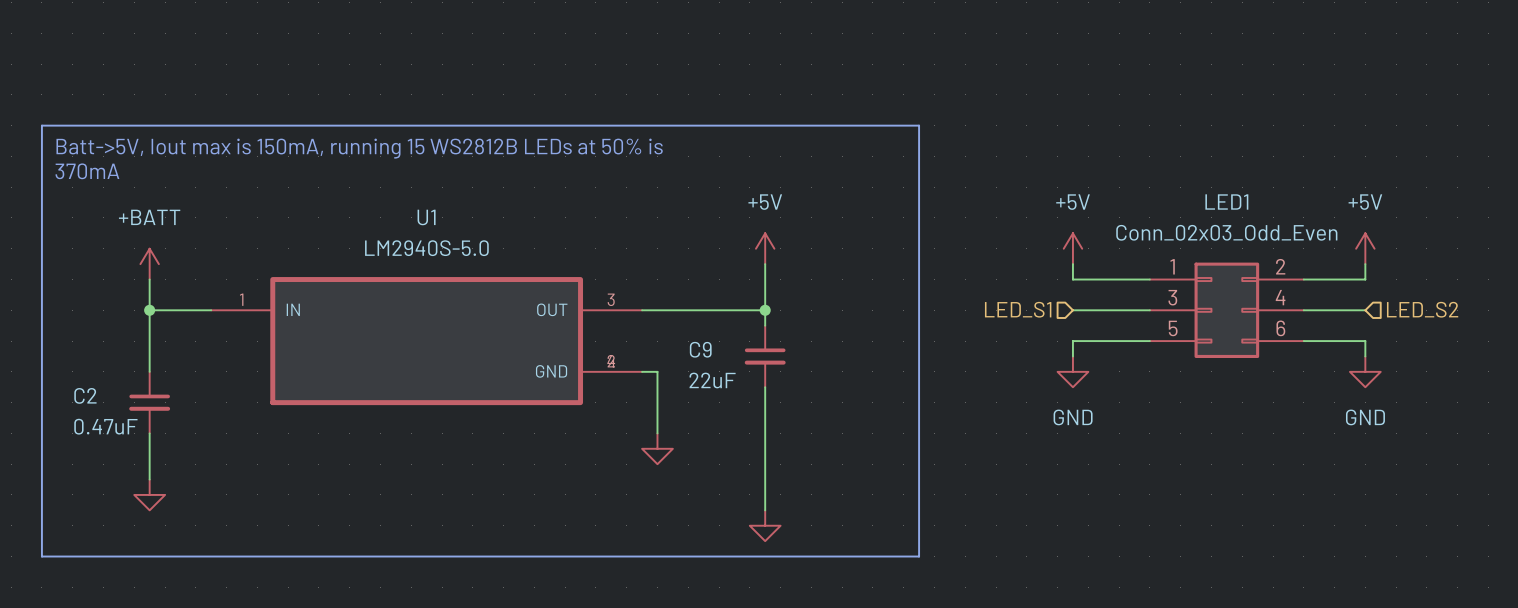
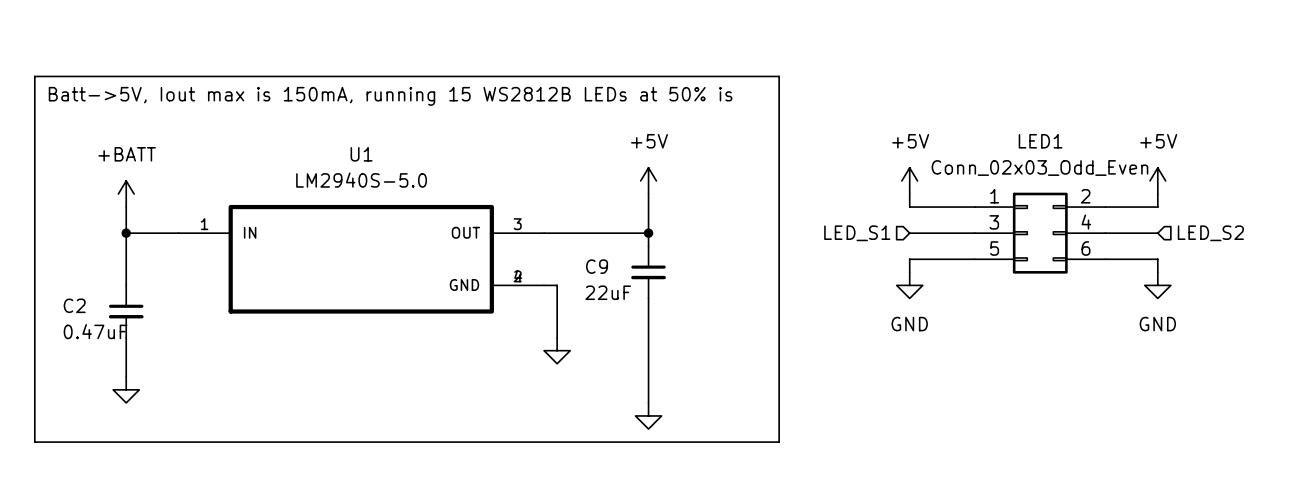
text: 370mA (87, 171) -> none

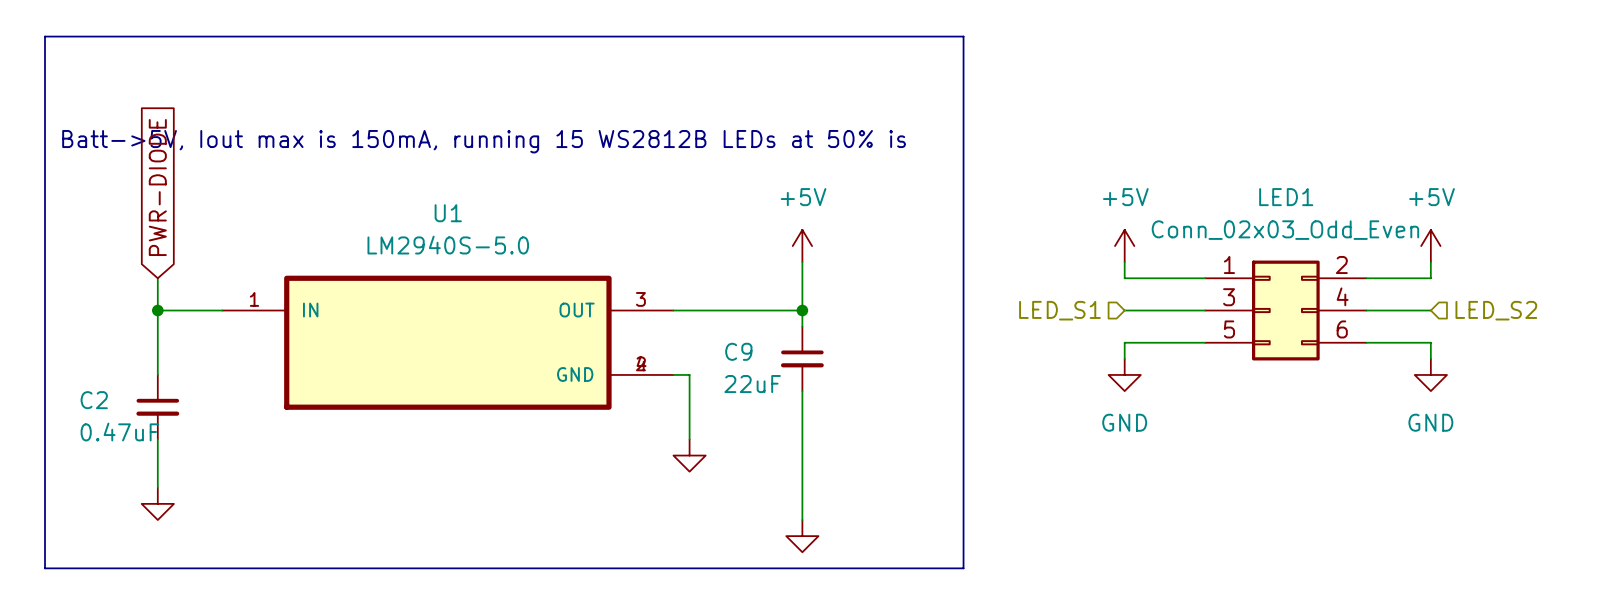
line: (34, 76) (779, 76) -> (45, 117) (45, 36) (963, 36) (963, 117)
global label: none -> PWR-DIODE (157, 187)
power symbol: +BATT (126, 193) -> none

